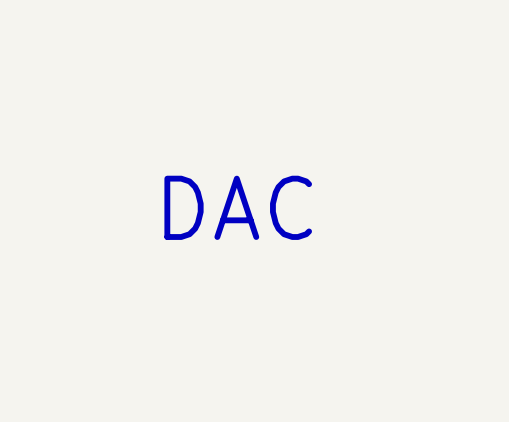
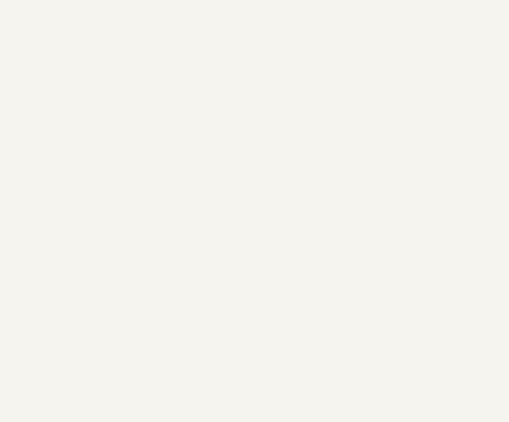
text: DAC (238, 207) -> none

